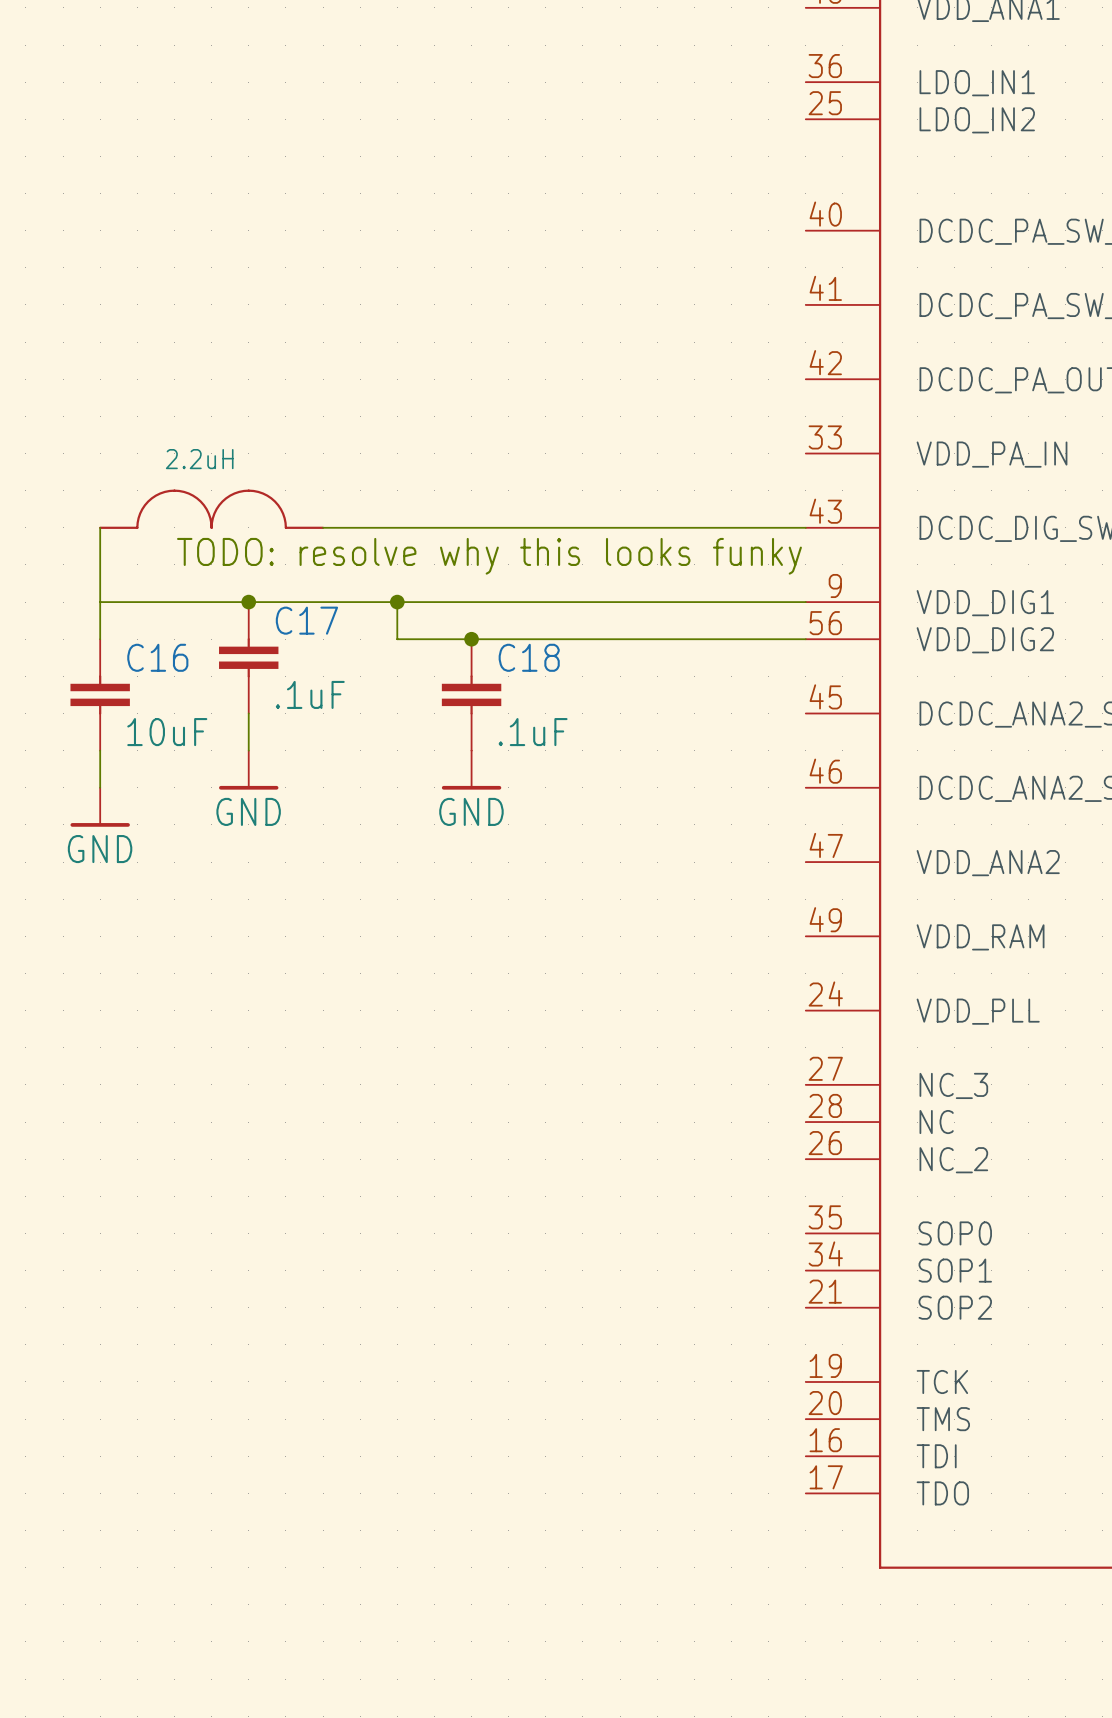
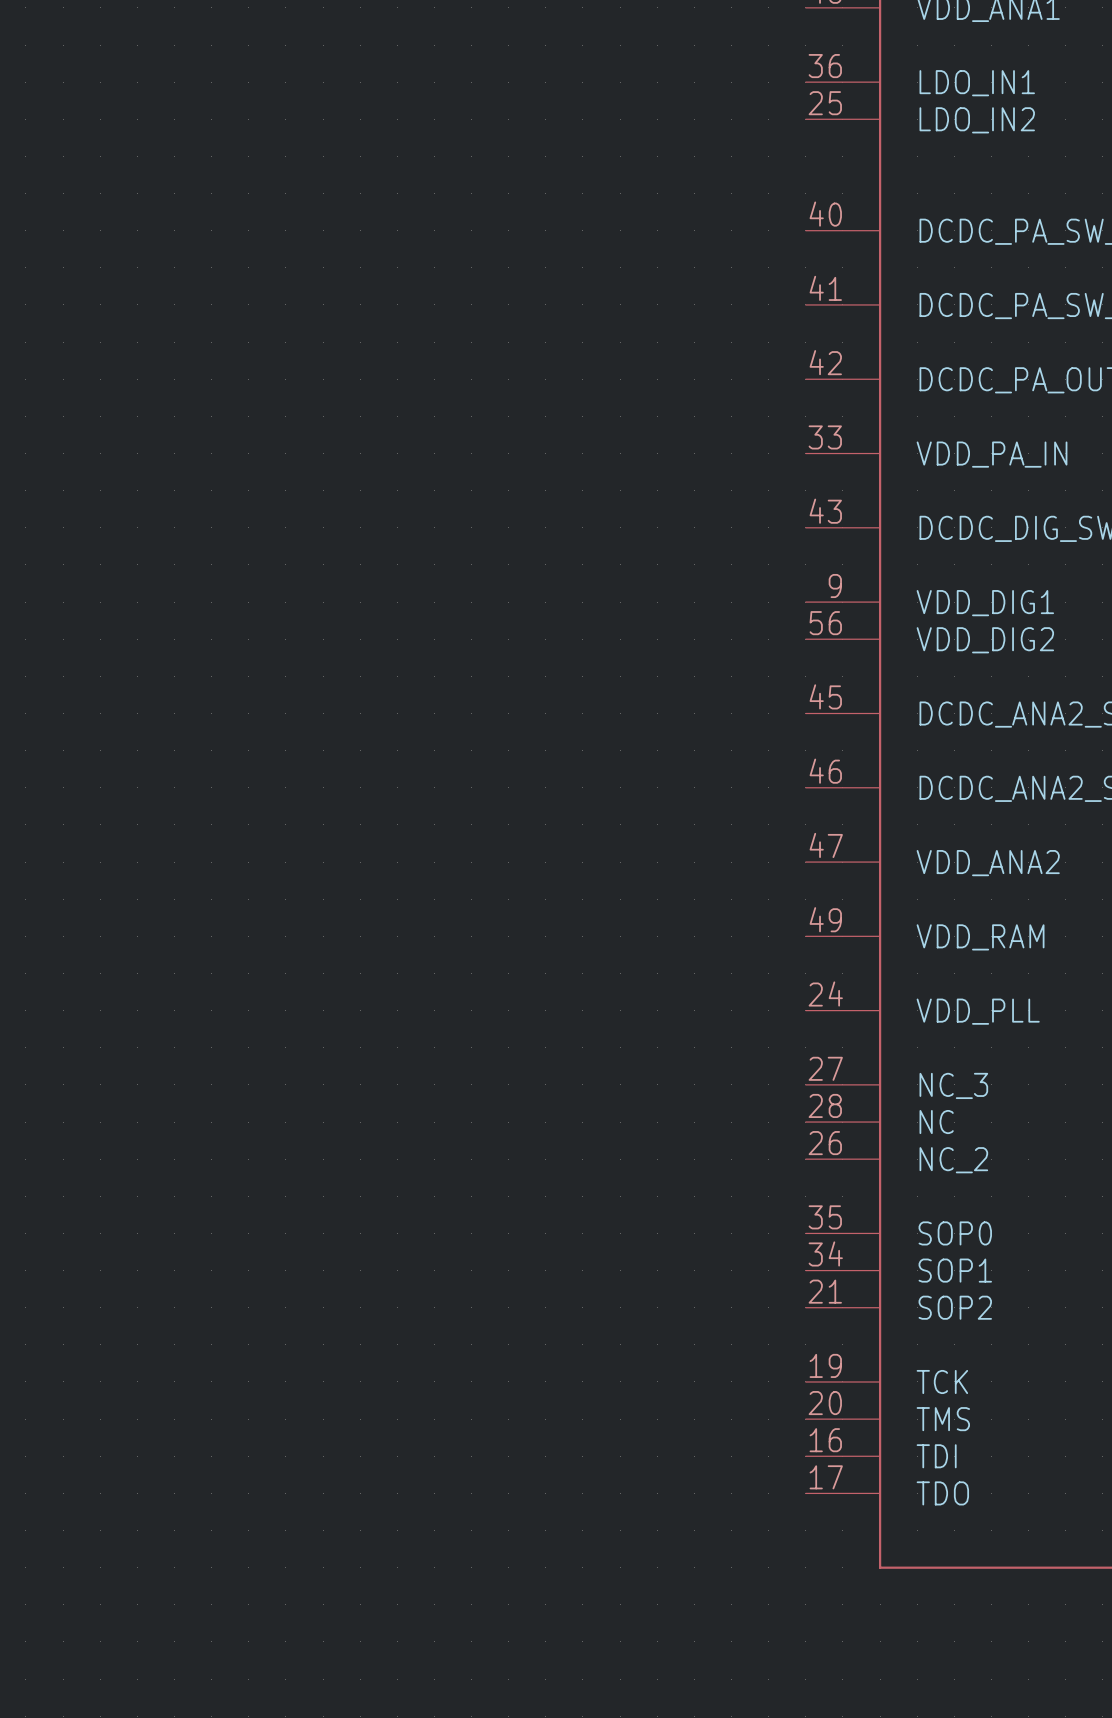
part: 2.2uH (211, 509) -> none
wire: (100, 527) (100, 639) -> none
wire: (323, 527) (805, 527) -> none
text: TODO: resolve why this looks funky (489, 556) -> none
wire: (100, 602) (805, 602) -> none
junction: (248, 602) -> none
wire: (397, 602) (397, 639) (805, 639) -> none
junction: (397, 602) -> none
junction: (471, 639) -> none
C17: .1uF (248, 657) -> none
C16: 10uF (100, 694) -> none
C18: .1uF (471, 694) -> none
wire: (248, 713) (248, 750) -> none
wire: (100, 750) (100, 787) -> none
power symbol: GND (248, 770) -> none
power symbol: GND (471, 770) -> none
power symbol: GND (100, 807) -> none

